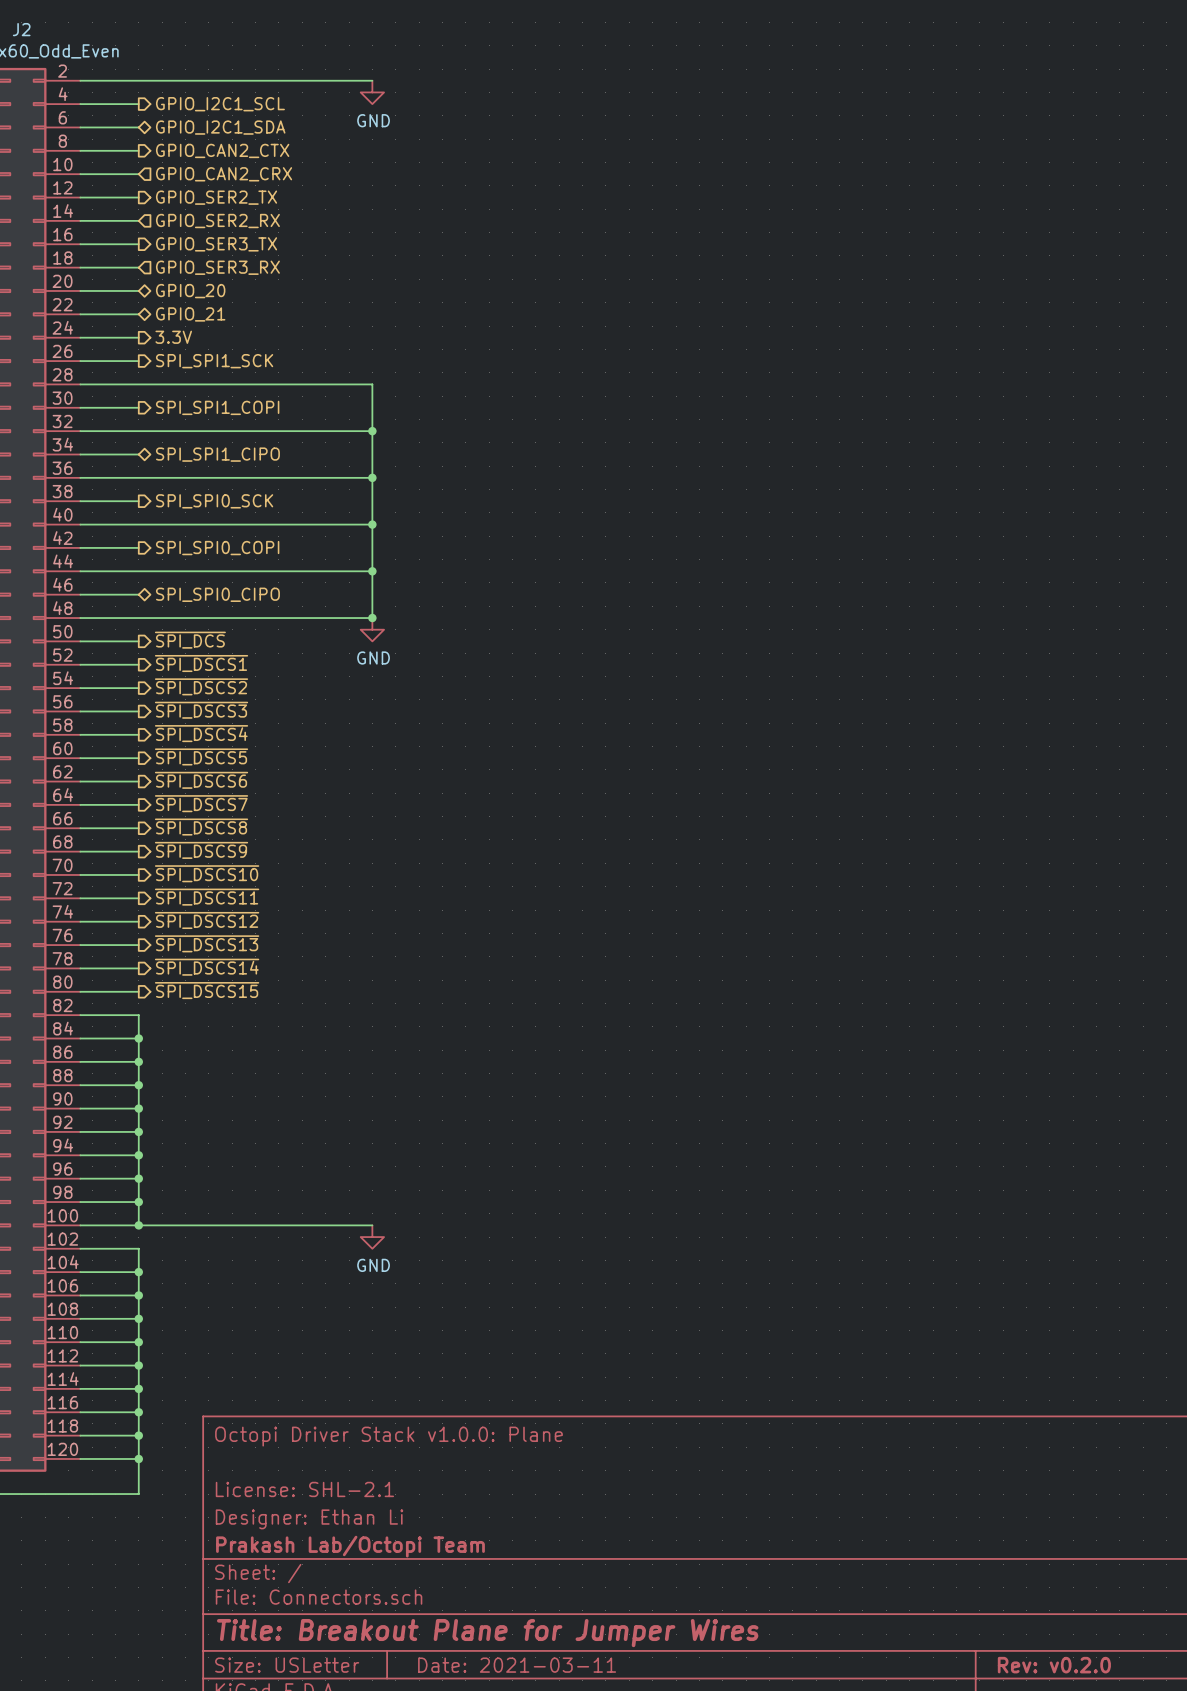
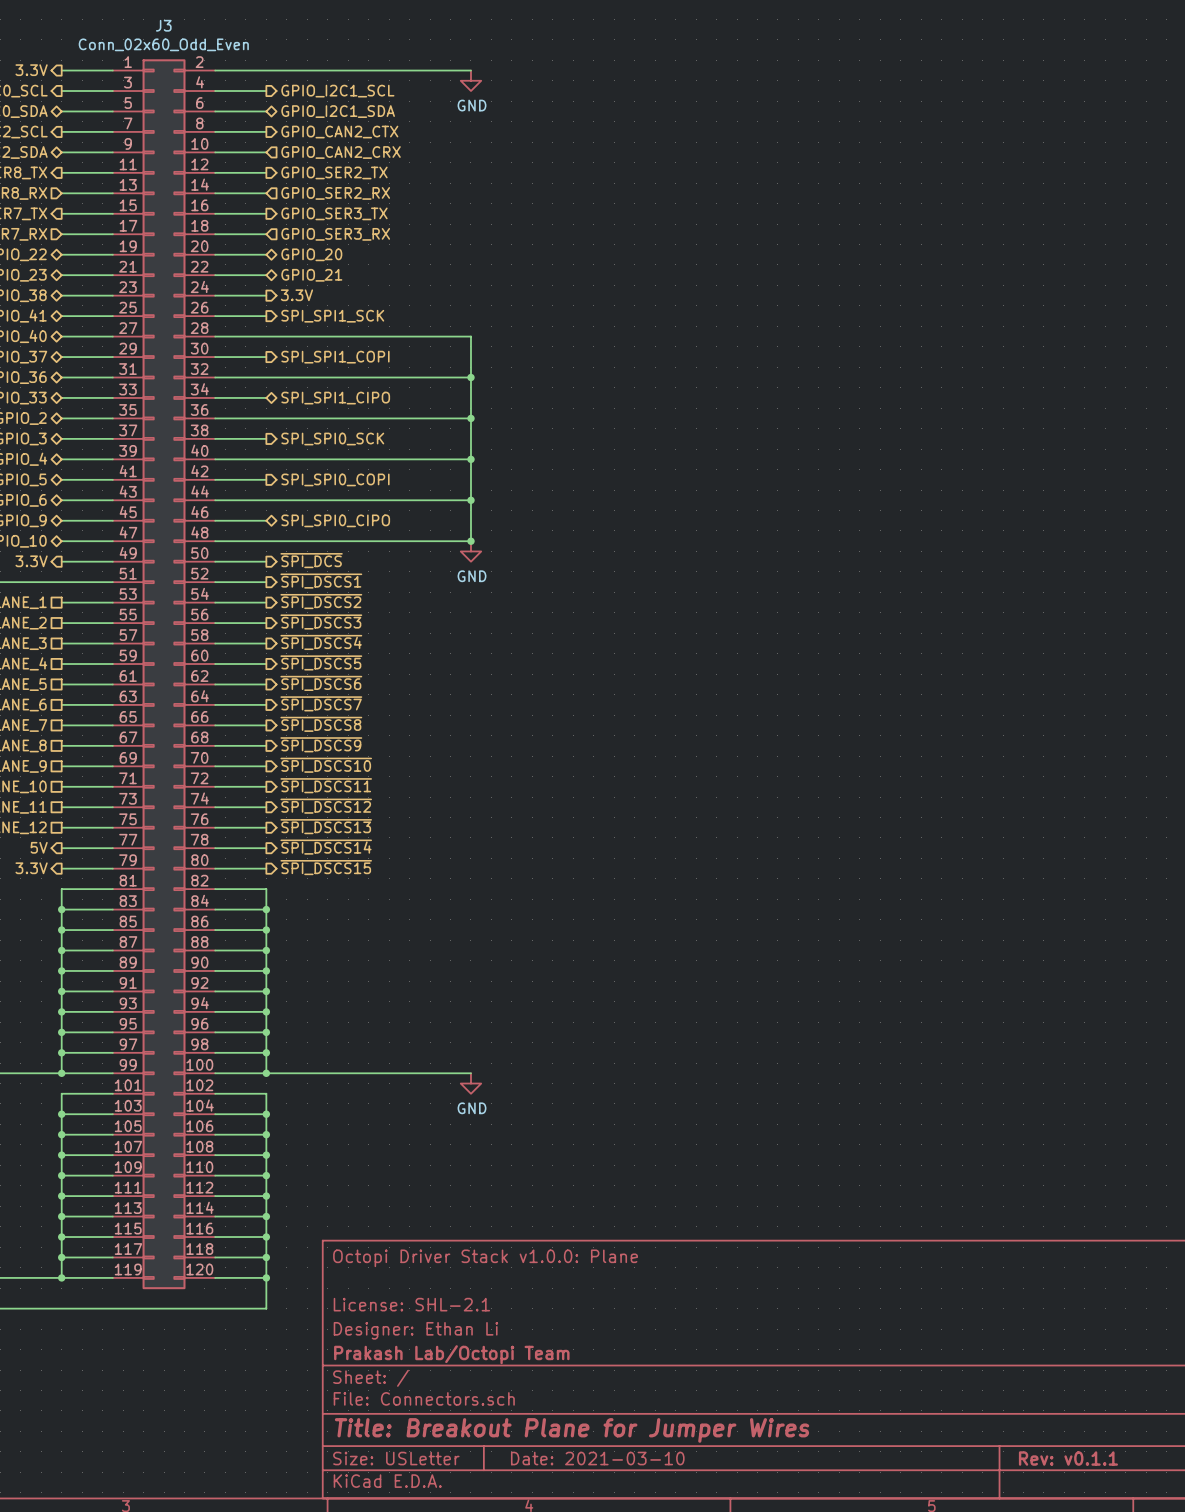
J2 name: J2 (21, 29) -> J3 (163, 25)
title block: Date: 2021-03-11 (517, 1665) -> Date: 2021-03-10 (597, 1458)
title block: Rev: v0.2.0 (1054, 1665) -> Rev: v0.1.1 (1068, 1458)

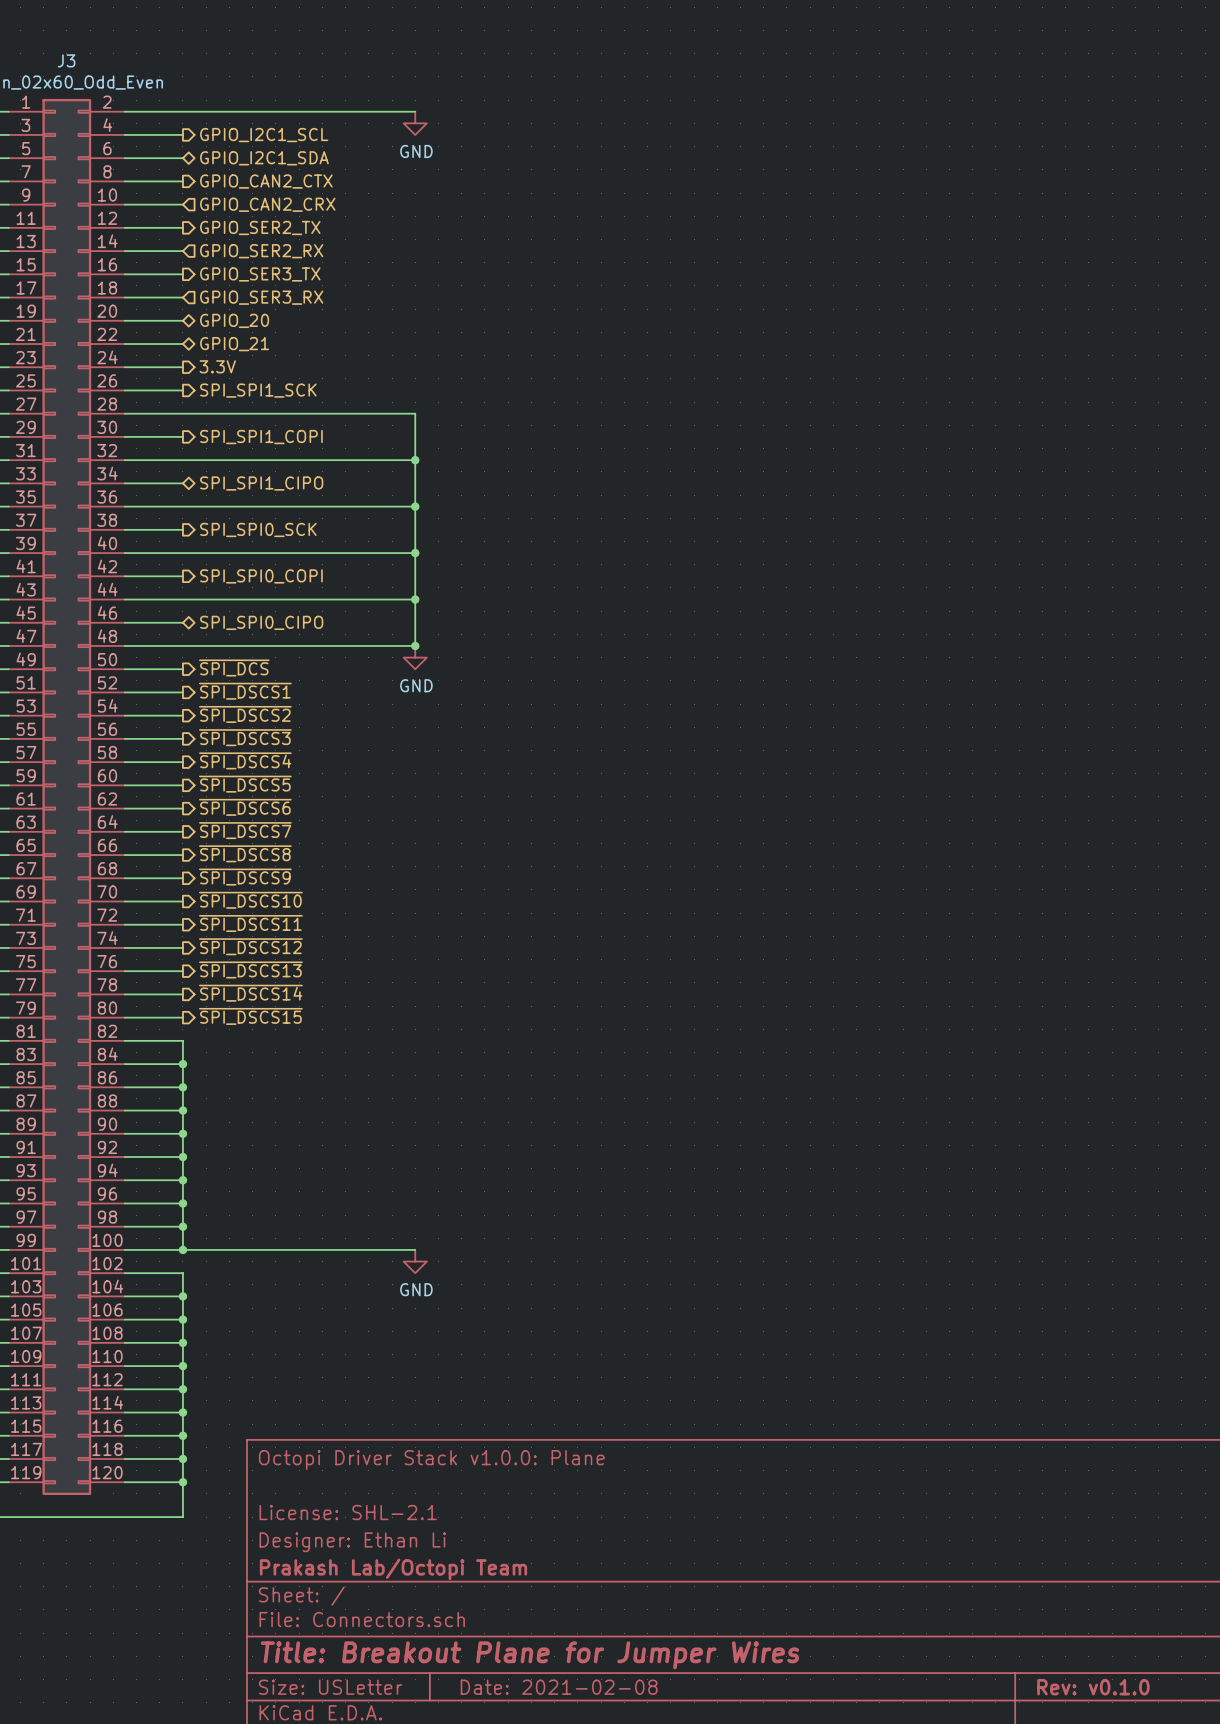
title block: Date: 2021-03-10 (597, 1458) -> Date: 2021-02-08 (559, 1687)
title block: Rev: v0.1.1 (1068, 1458) -> Rev: v0.1.0 (1093, 1687)

